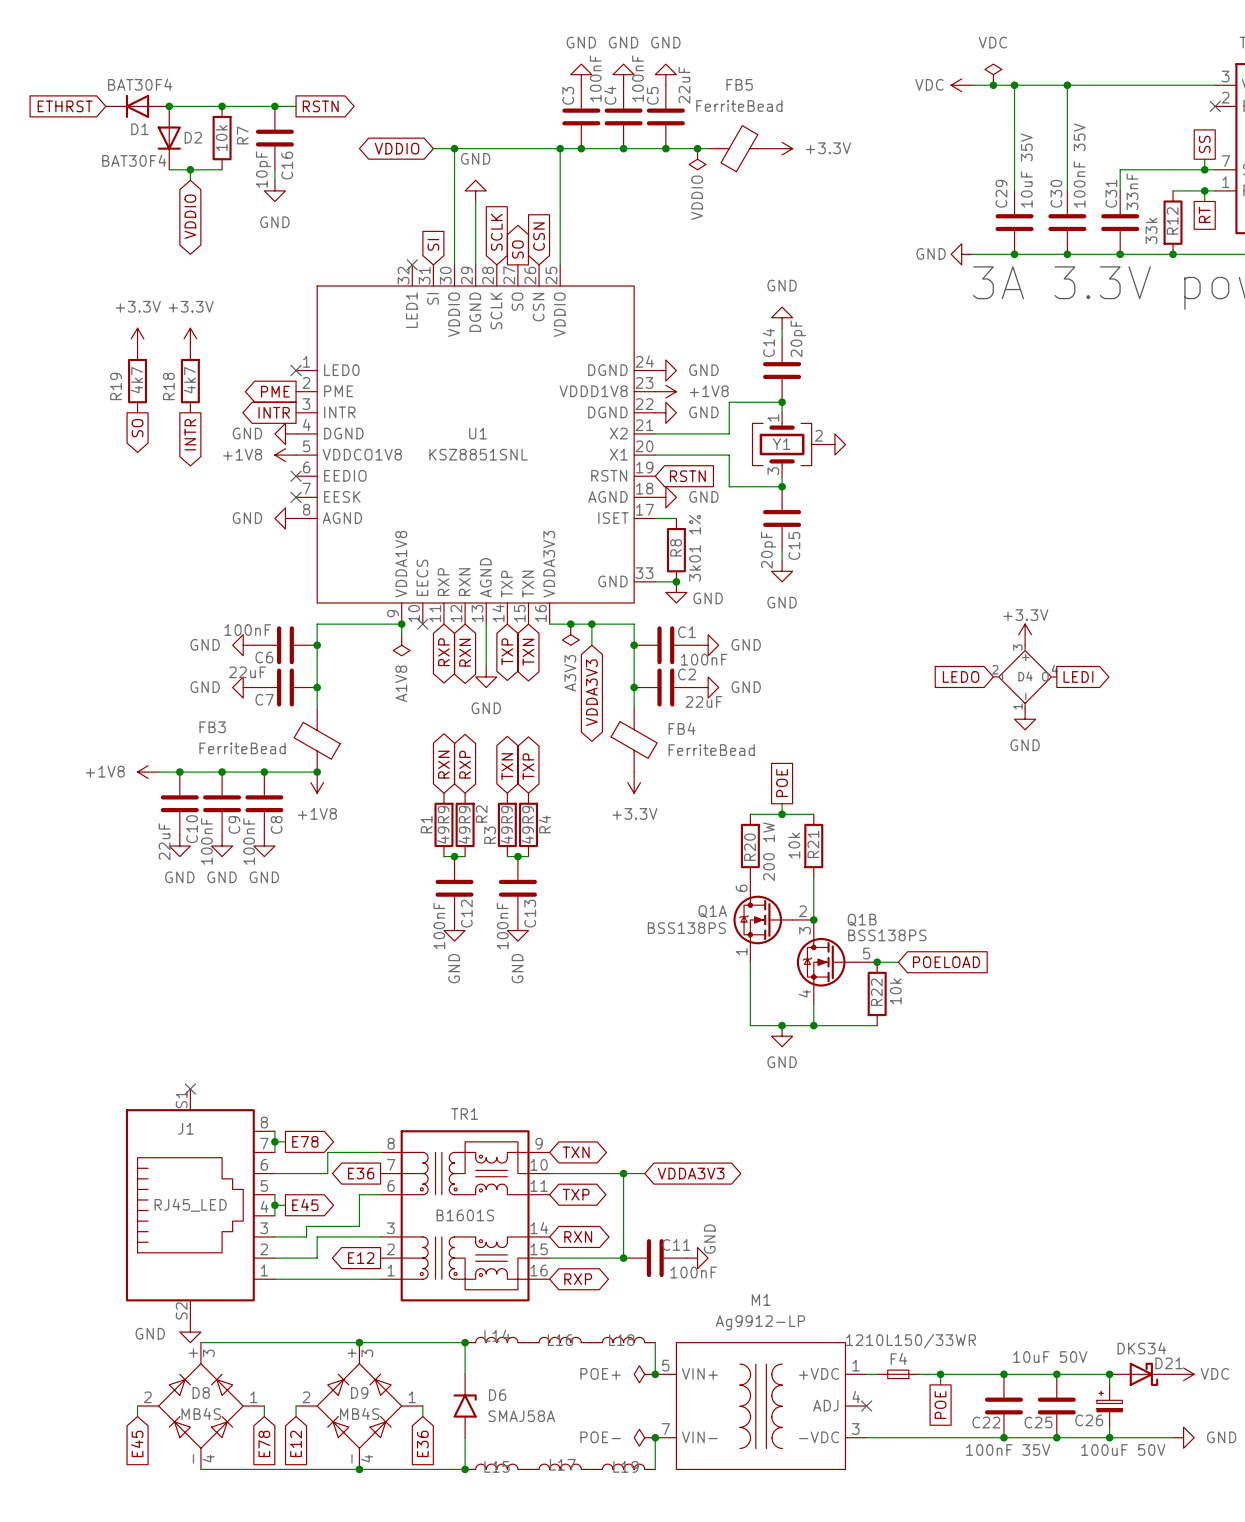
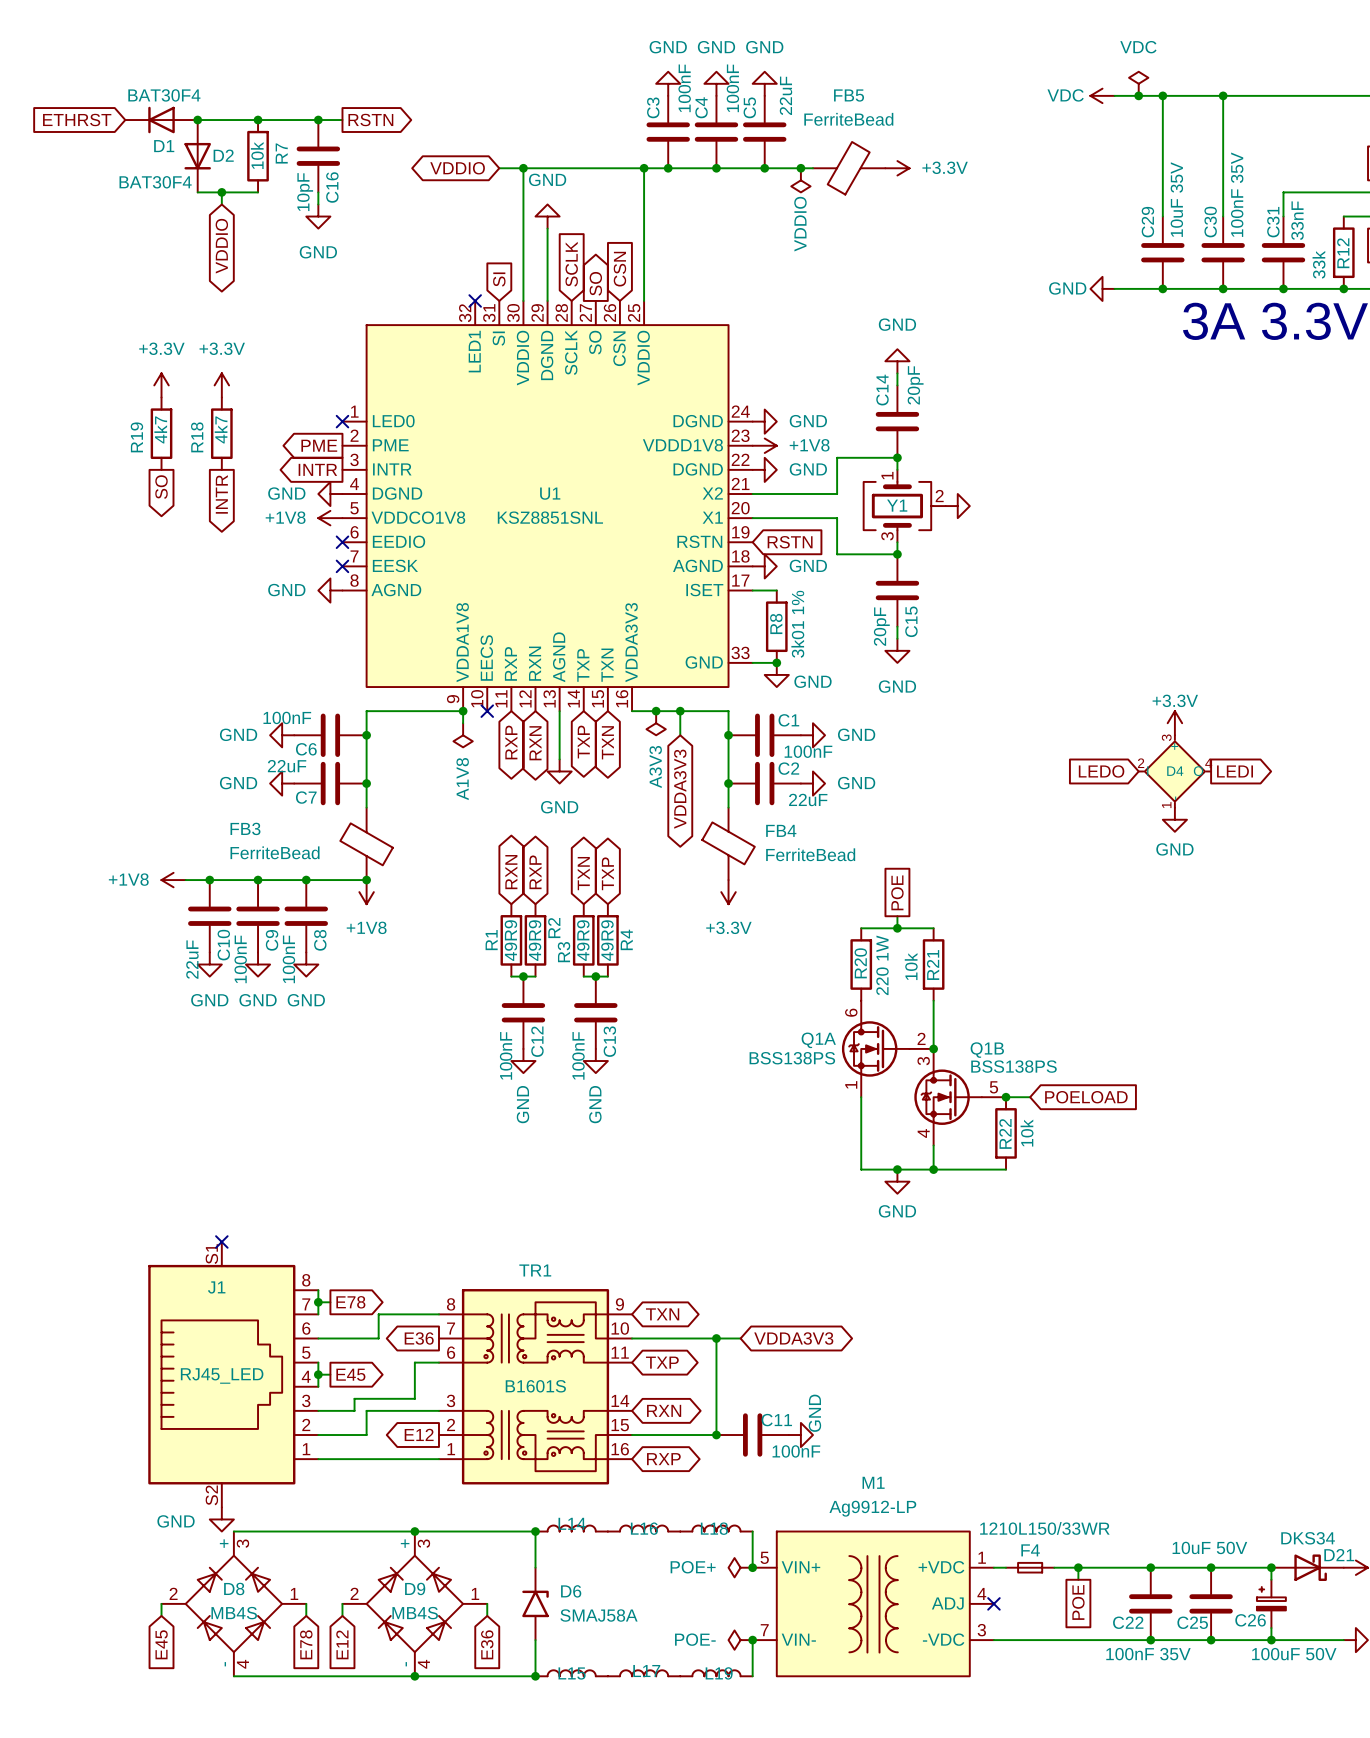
R20 value: 200 1W (769, 851) -> 220 1W (882, 965)

